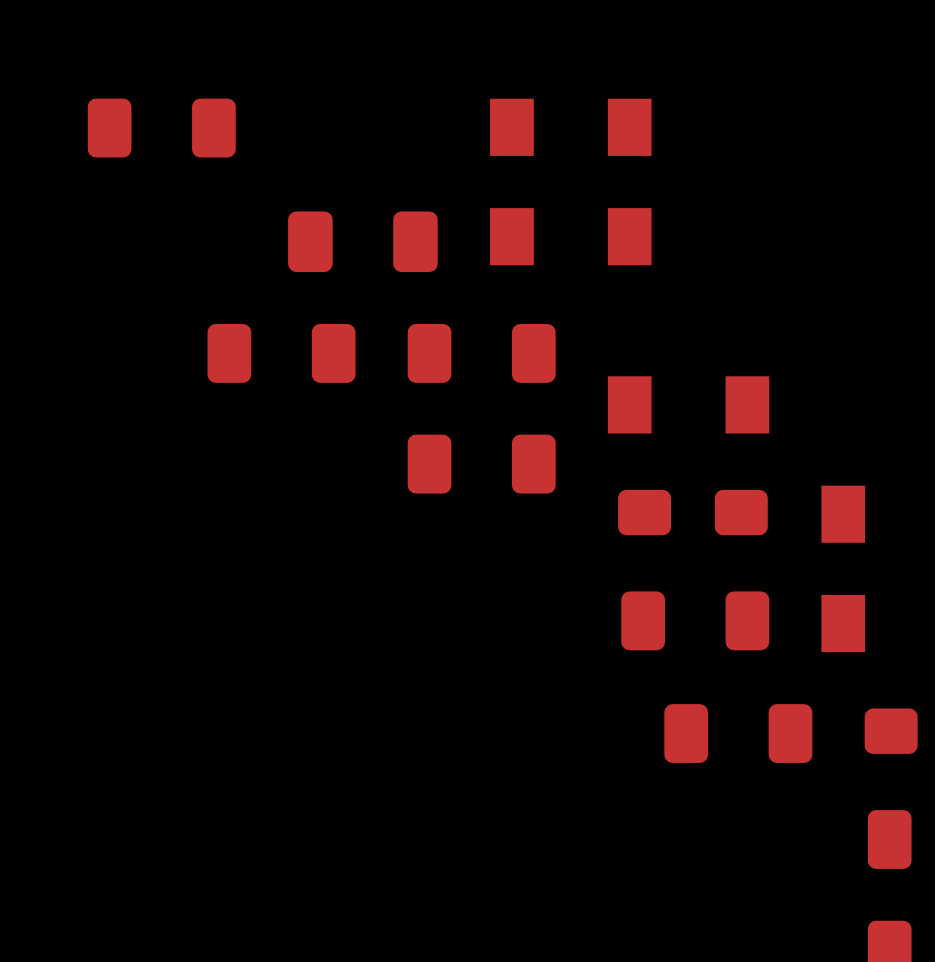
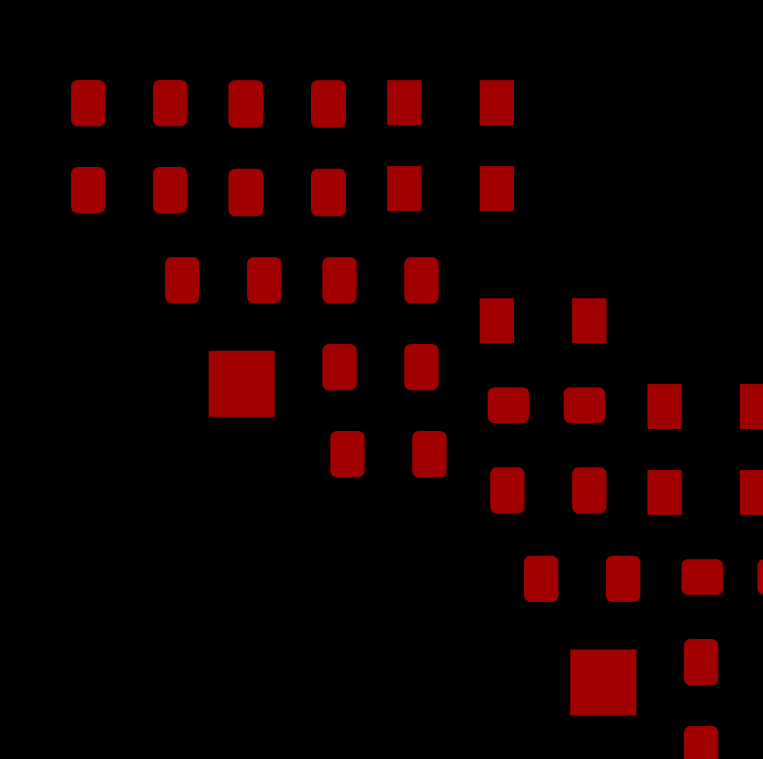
part: none -> (287, 103)
part: none -> (129, 190)
part: none -> (241, 383)
part: none -> (388, 454)
part: none -> (603, 682)

